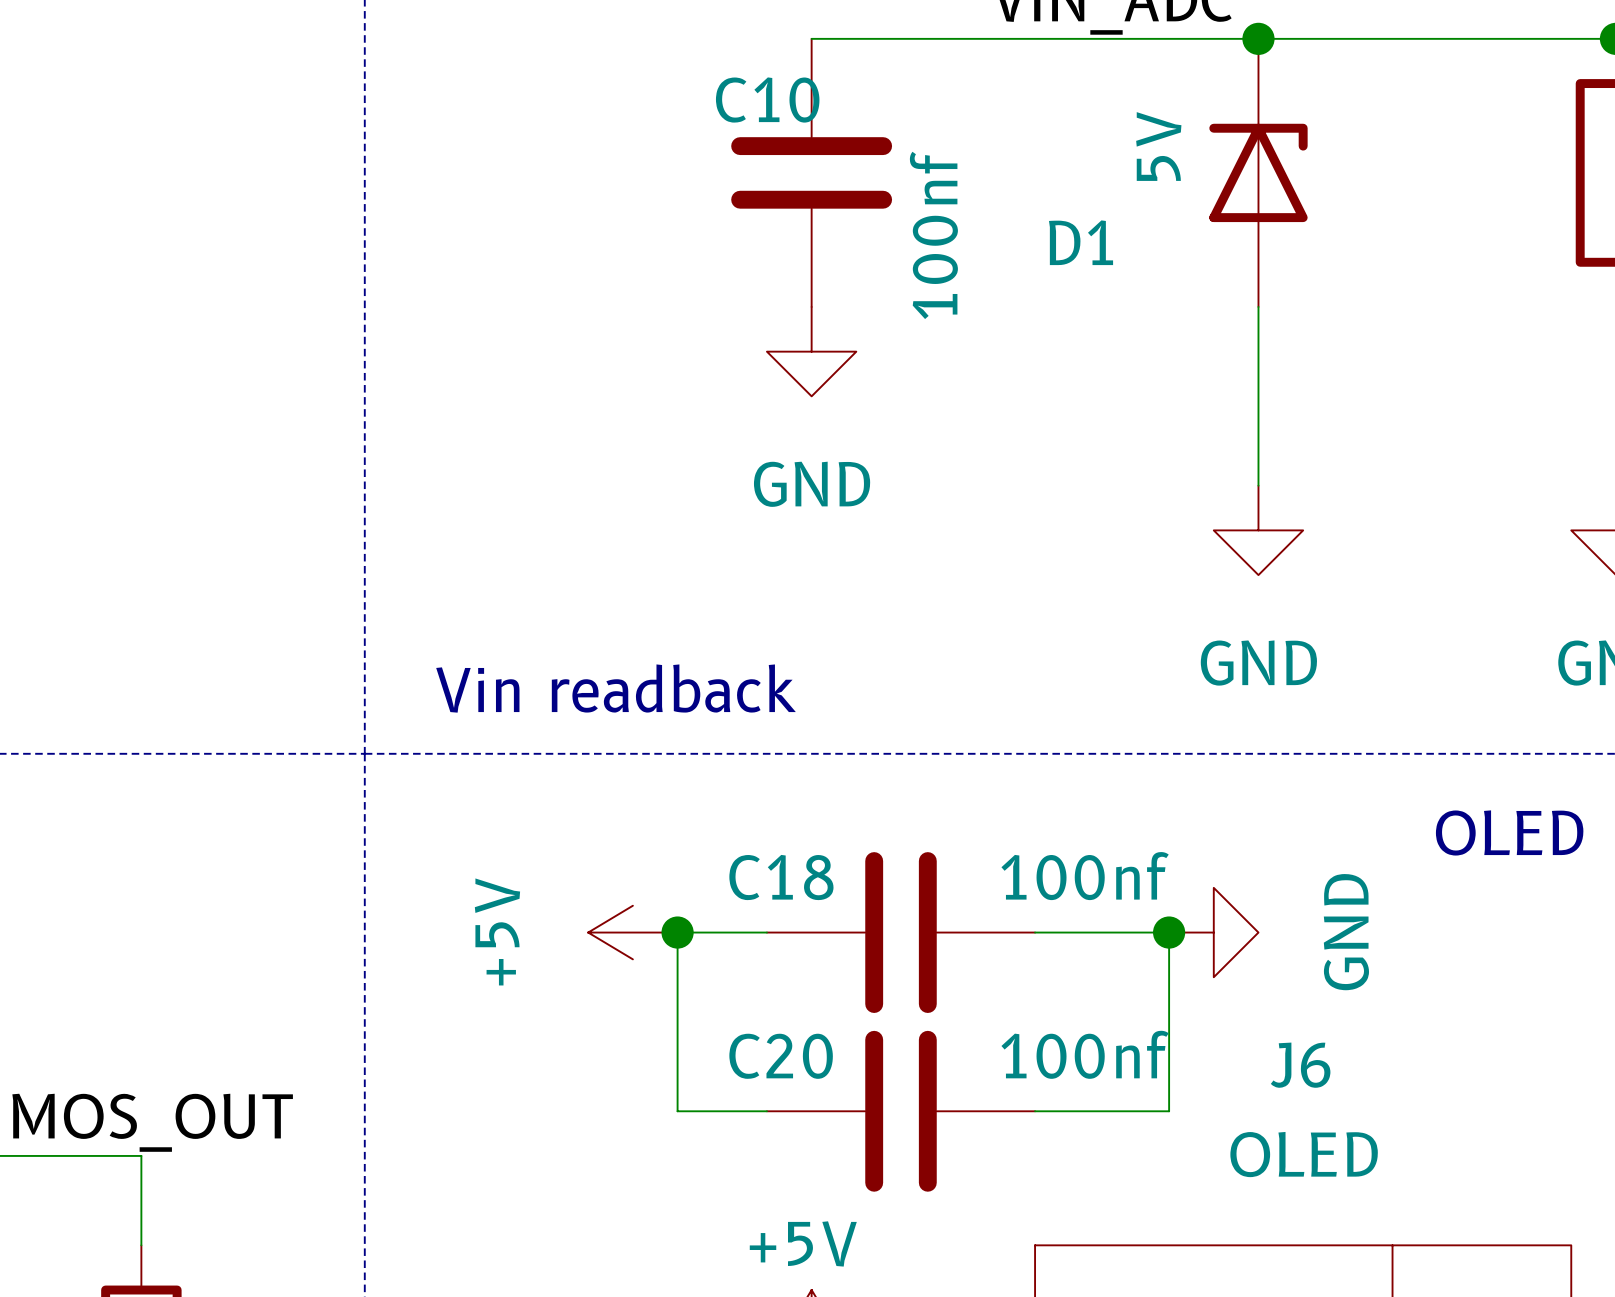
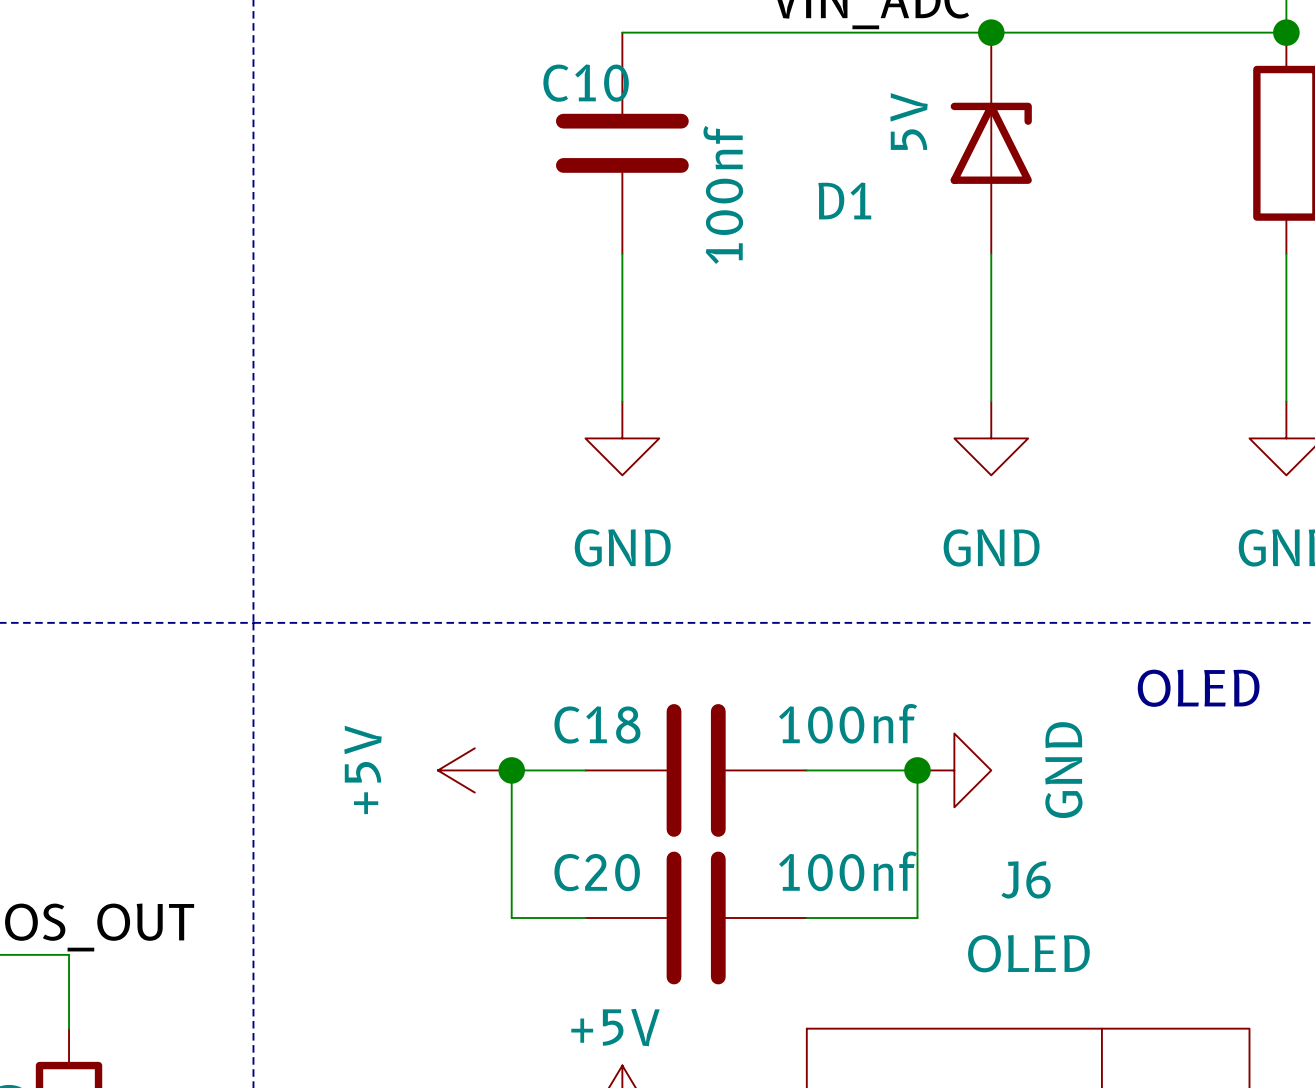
wire: none -> (622, 253) (622, 401)
power symbol position: GND (811, 351) -> GND (622, 438)
text: Vin readback (616, 688) -> none

